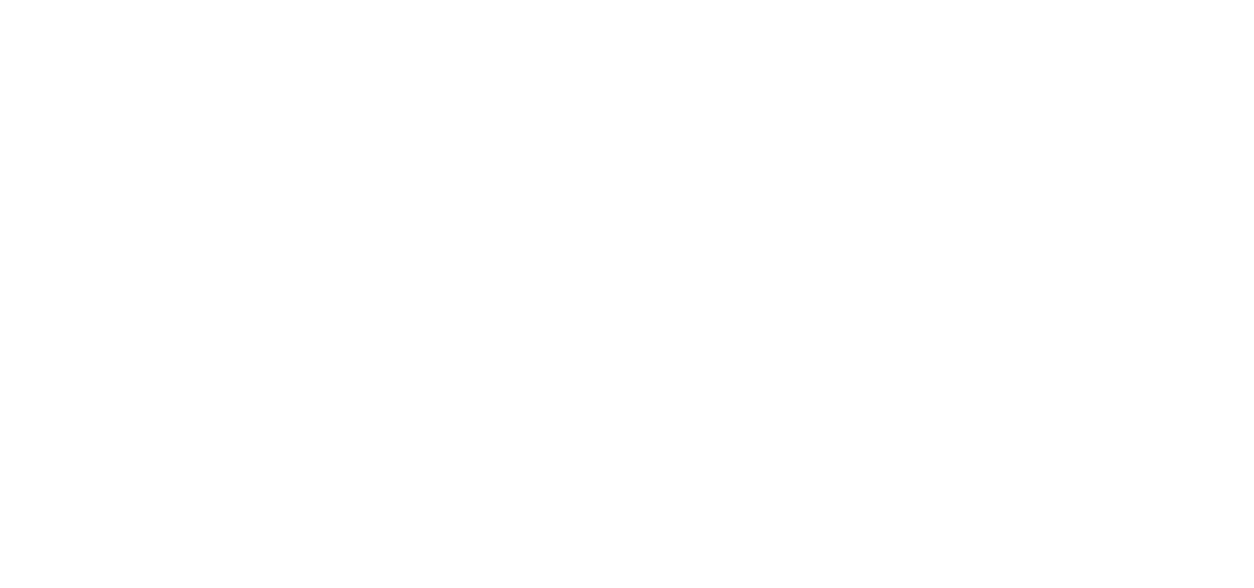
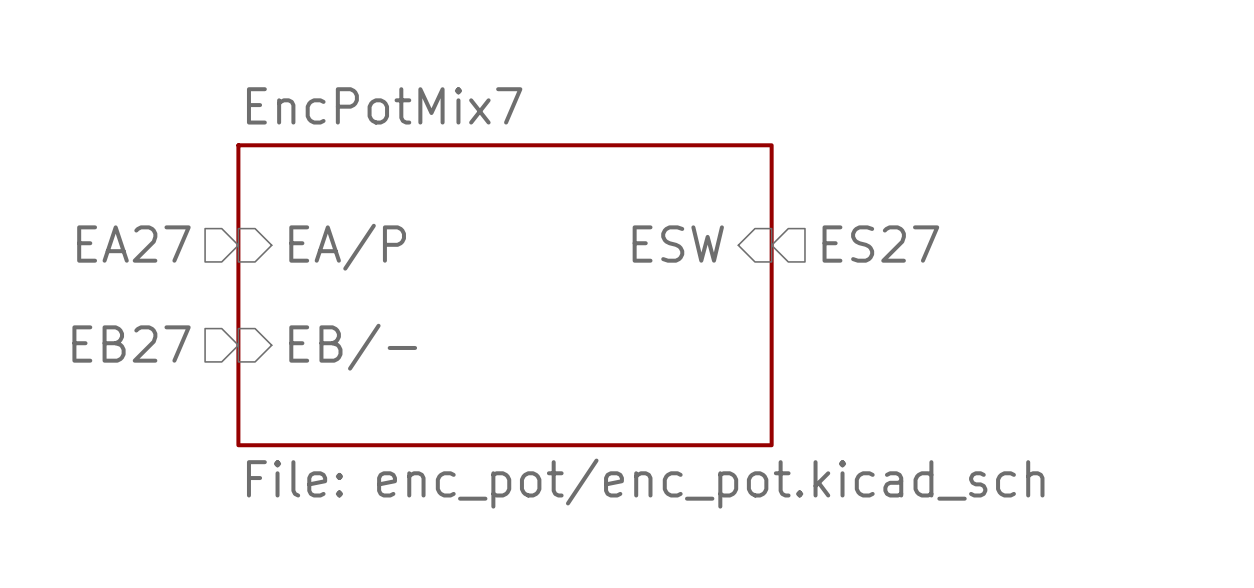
hierarchical label: none -> EA27 (133, 244)
sheet pin: none -> ESW (678, 244)
hierarchical label: none -> ES27 (880, 244)
sheet pin: none -> EA/P (347, 247)
sheet EncPotMix7: none -> File: enc_pot/enc_pot.kicad_sch (505, 295)
hierarchical label: none -> EB27 (131, 344)
sheet pin: none -> EB/- (353, 347)

